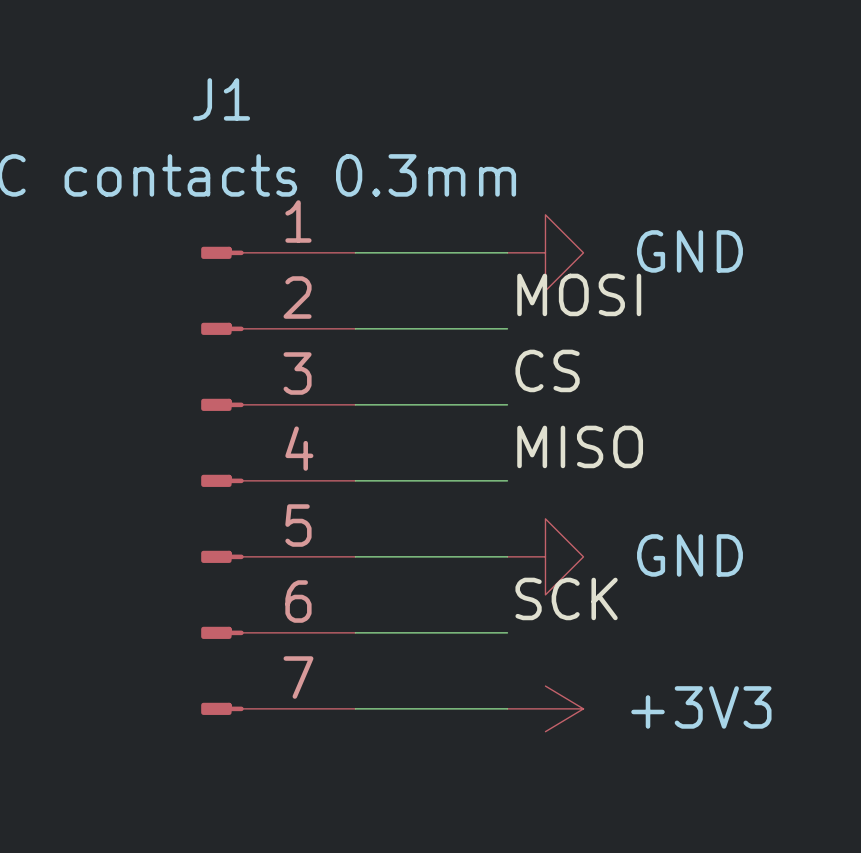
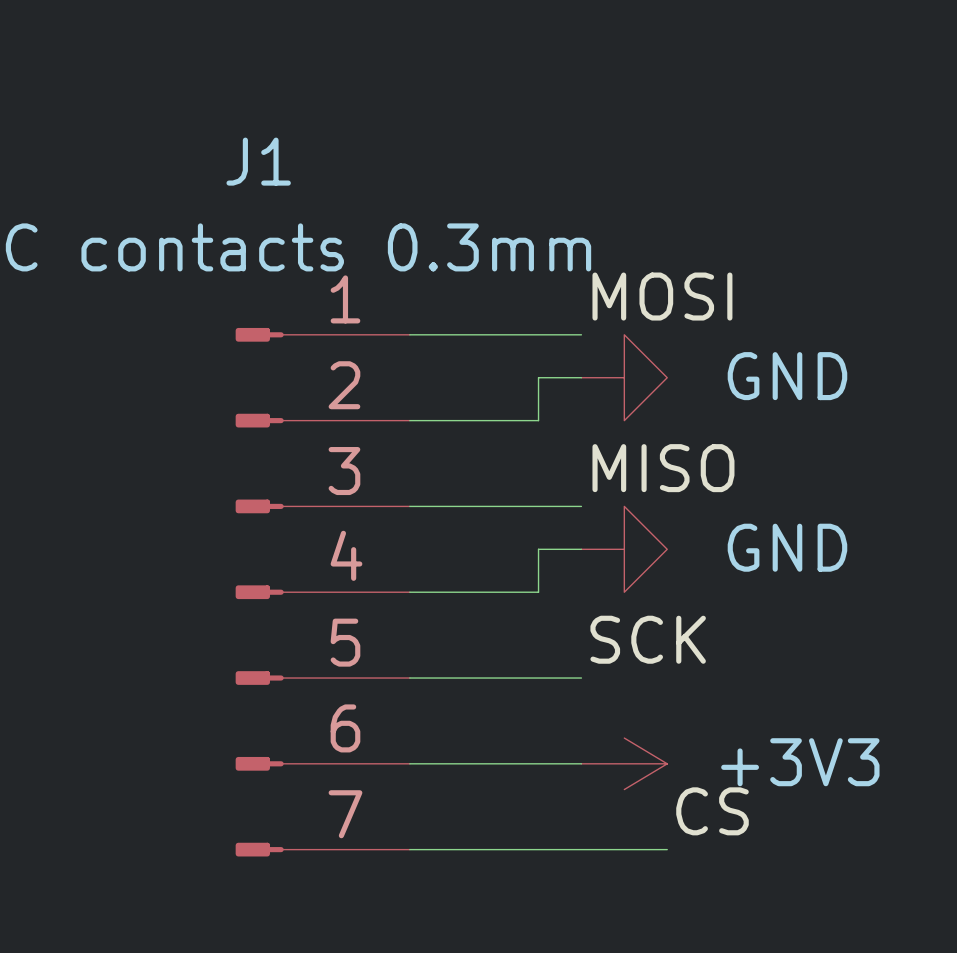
power symbol position: GND (545, 252) -> GND (624, 377)
label position: MOSI (579, 294) -> MOSI (662, 296)
wire: (469, 328) (507, 328) -> (538, 420) (538, 377) (581, 377)
label: CS (547, 370) -> MISO (663, 468)
power symbol: none -> GND (624, 549)
label: MISO (580, 446) -> none
wire: (469, 480) (507, 480) -> (538, 592) (538, 549) (581, 549)
power symbol: GND (545, 556) -> none
label position: SCK (566, 598) -> SCK (648, 639)
label: none -> CS (712, 811)
power symbol position: +3V3 (545, 708) -> +3V3 (624, 763)

